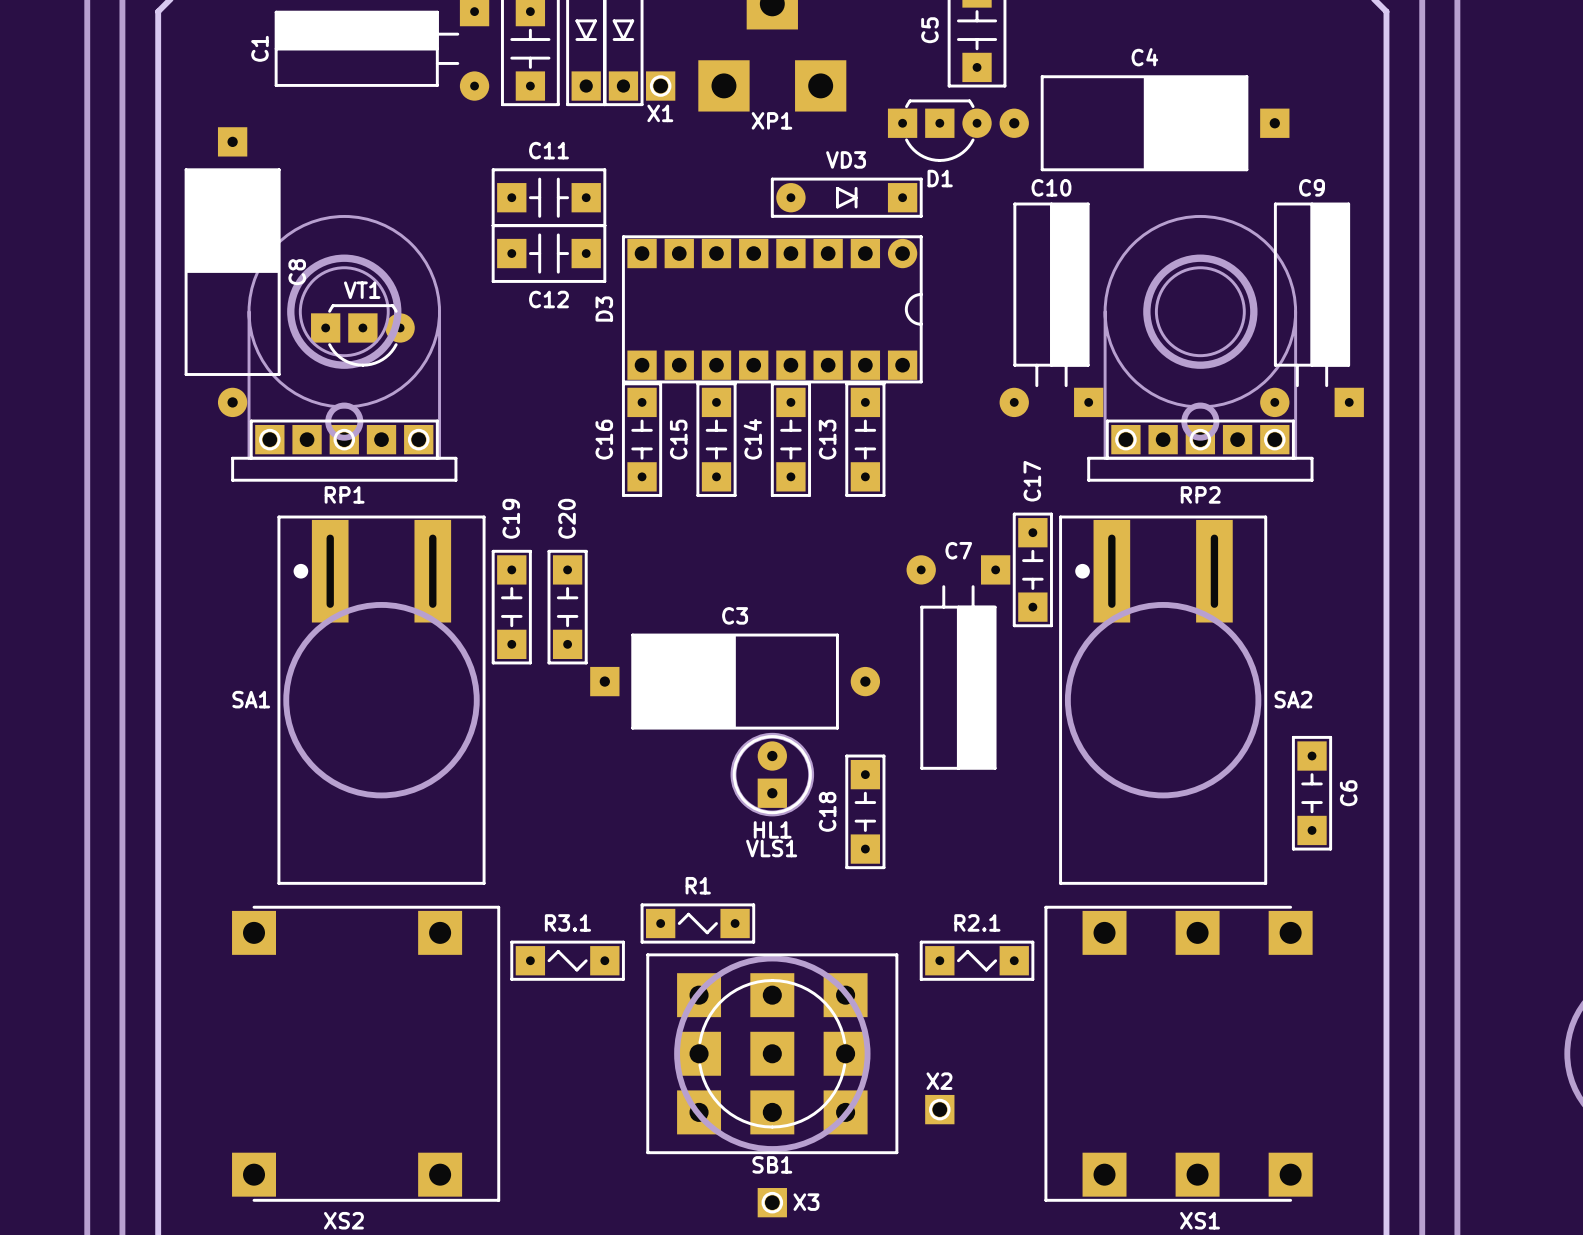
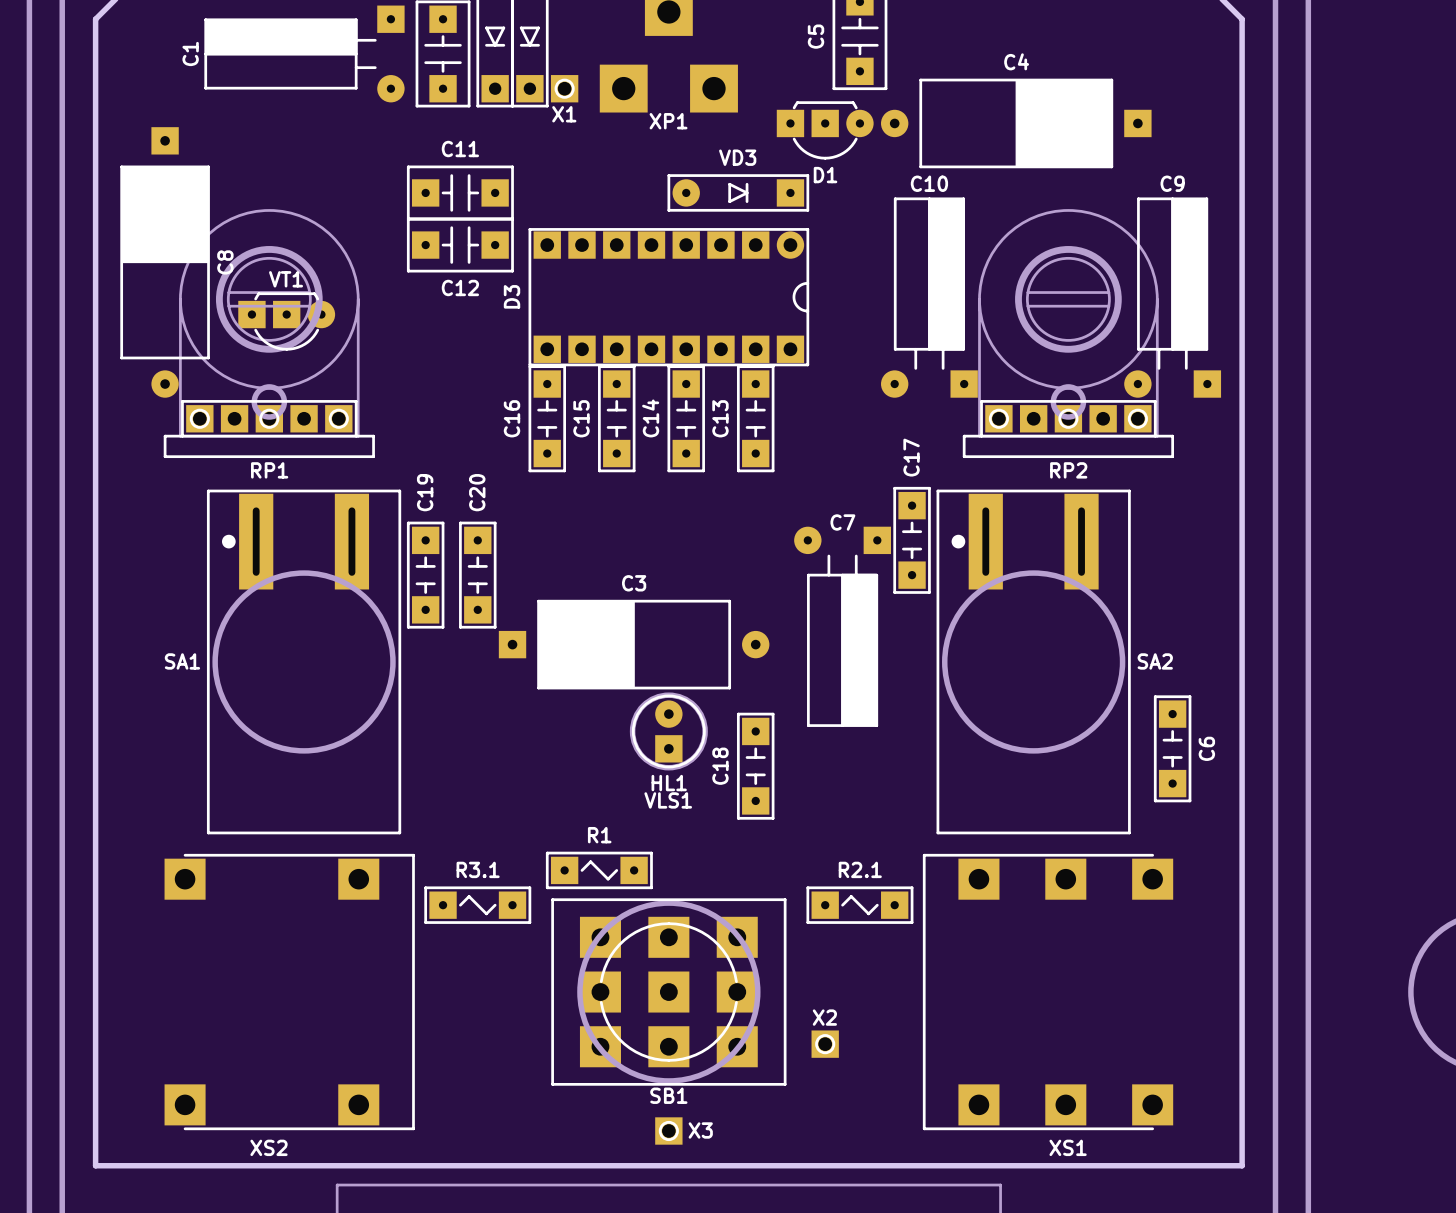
RP1 footprint: [231, 214, 458, 482] -> [163, 209, 375, 459]
RP2 footprint: [1087, 214, 1314, 482] -> [962, 209, 1175, 459]

